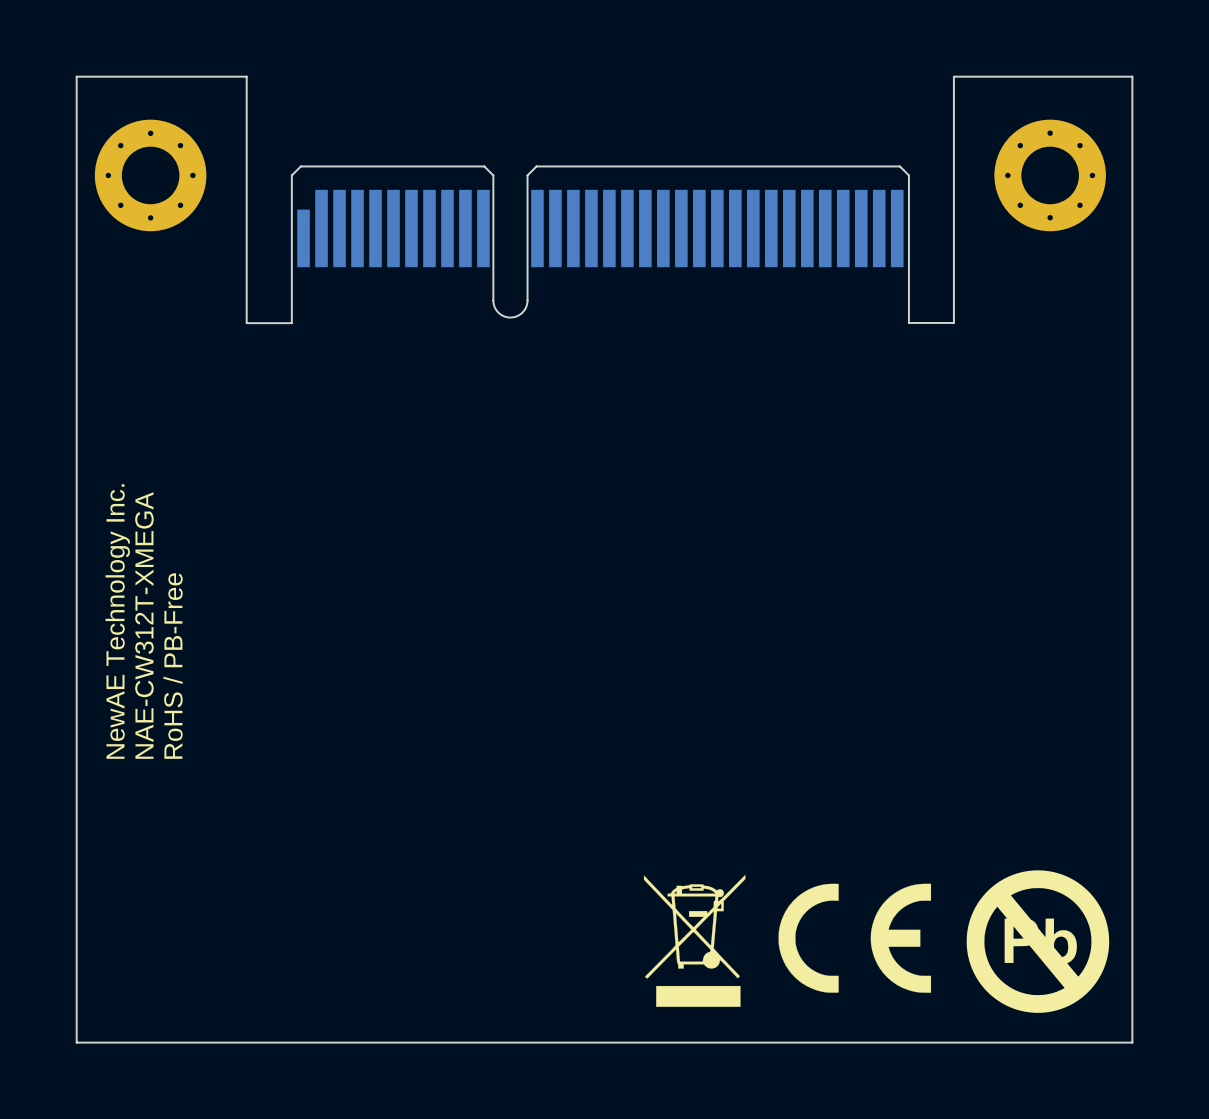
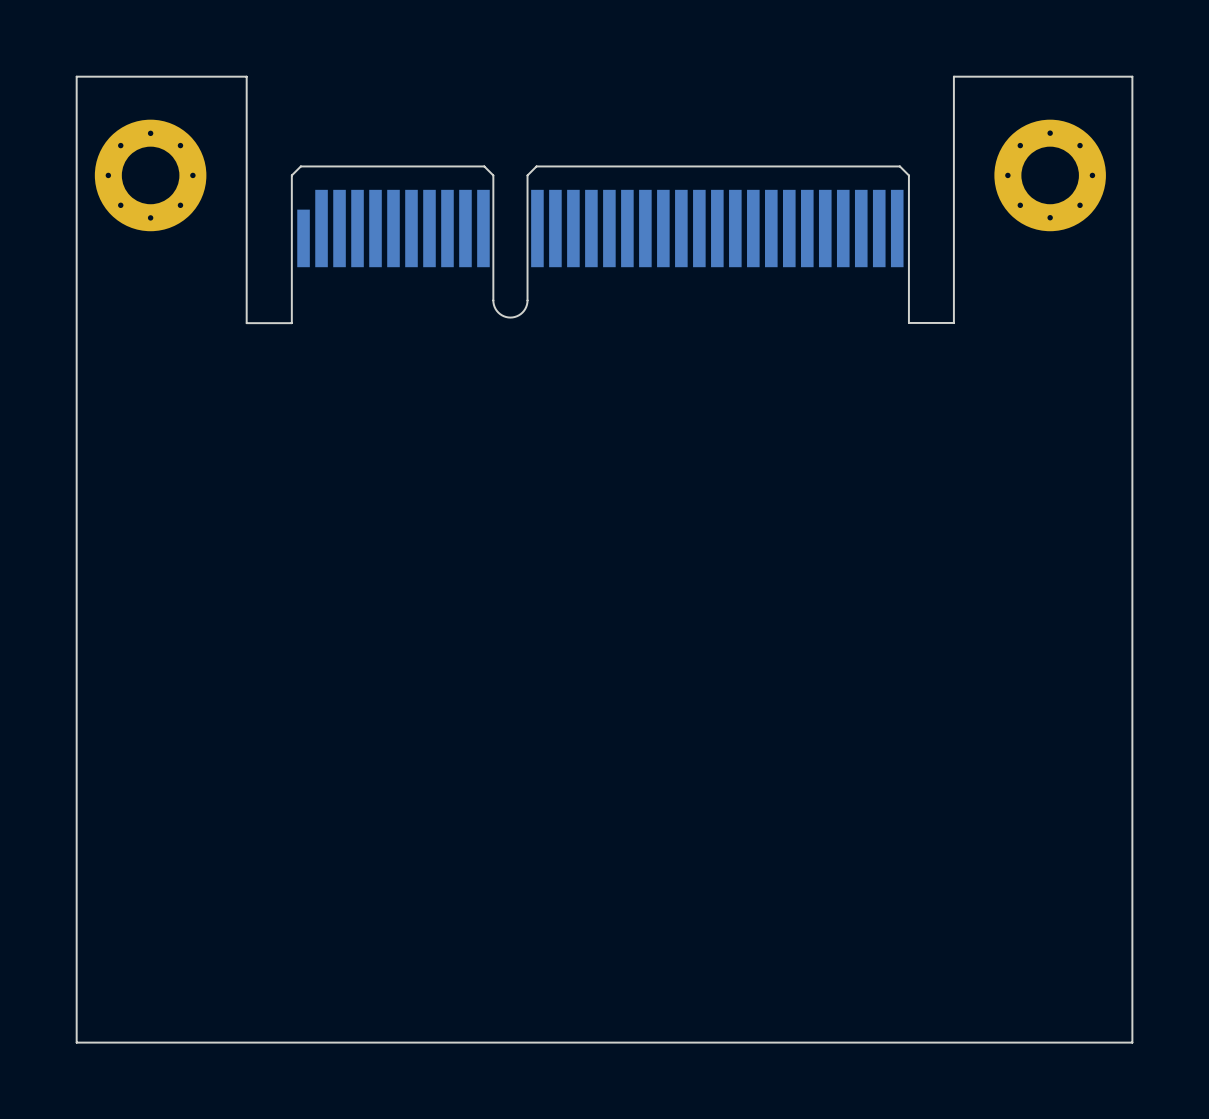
text: NewAE Technology Inc. (117, 621) -> none
text: NAE-CW312T-XMEGA (144, 625) -> none
text: RoHS / PB-Free (173, 666) -> none
drawing: [966, 870, 1110, 1013] -> none
drawing: [643, 874, 746, 1007] -> none
drawing: [778, 883, 932, 993] -> none

